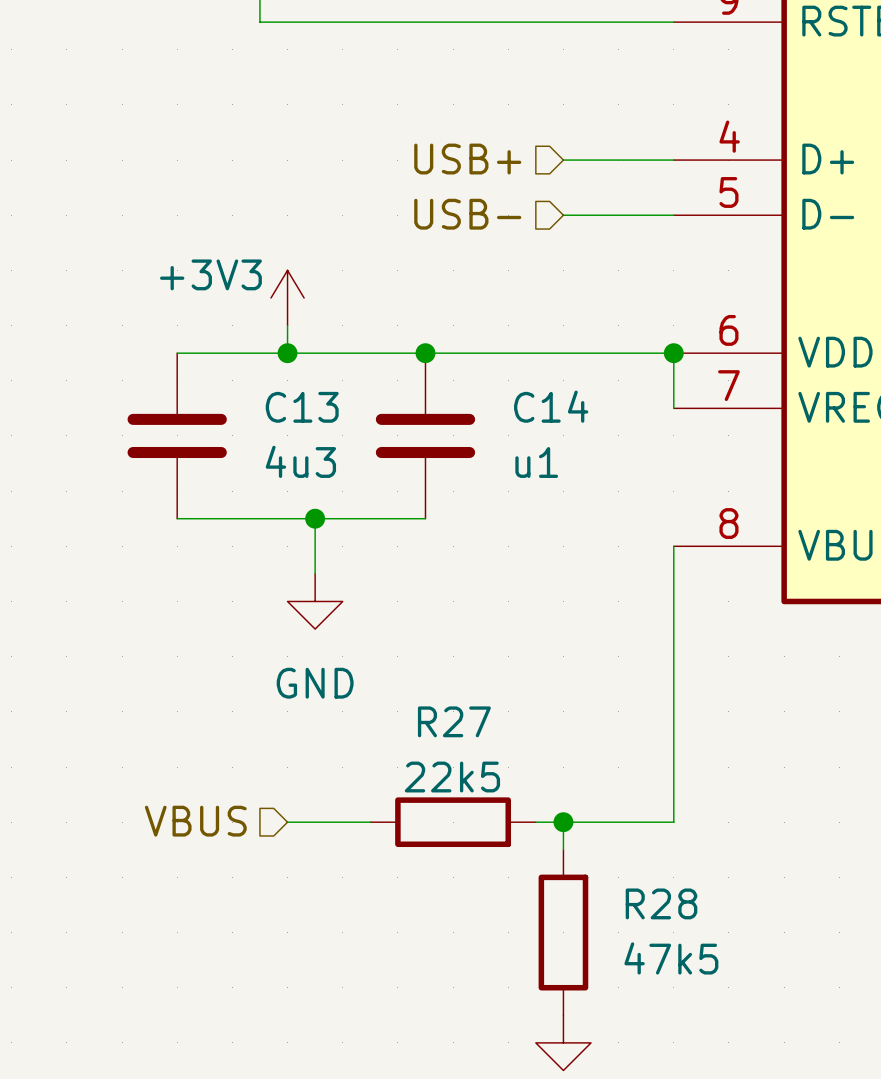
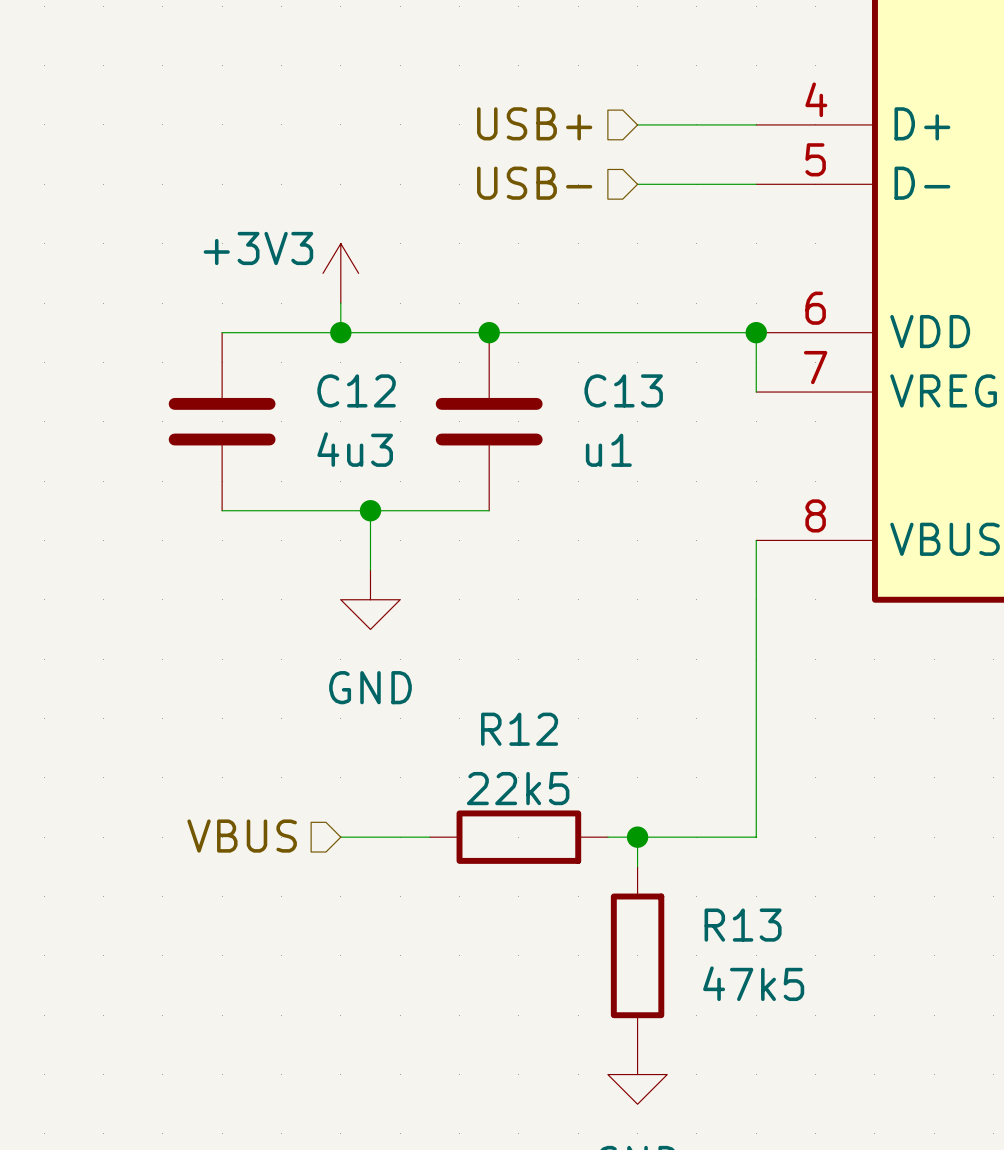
C14 name: C14 (551, 406) -> C13 (623, 390)
C13 name: C13 (302, 407) -> C12 (356, 390)
R27 name: R27 (454, 721) -> R12 (519, 729)
R28 name: R28 (661, 903) -> R13 (743, 925)

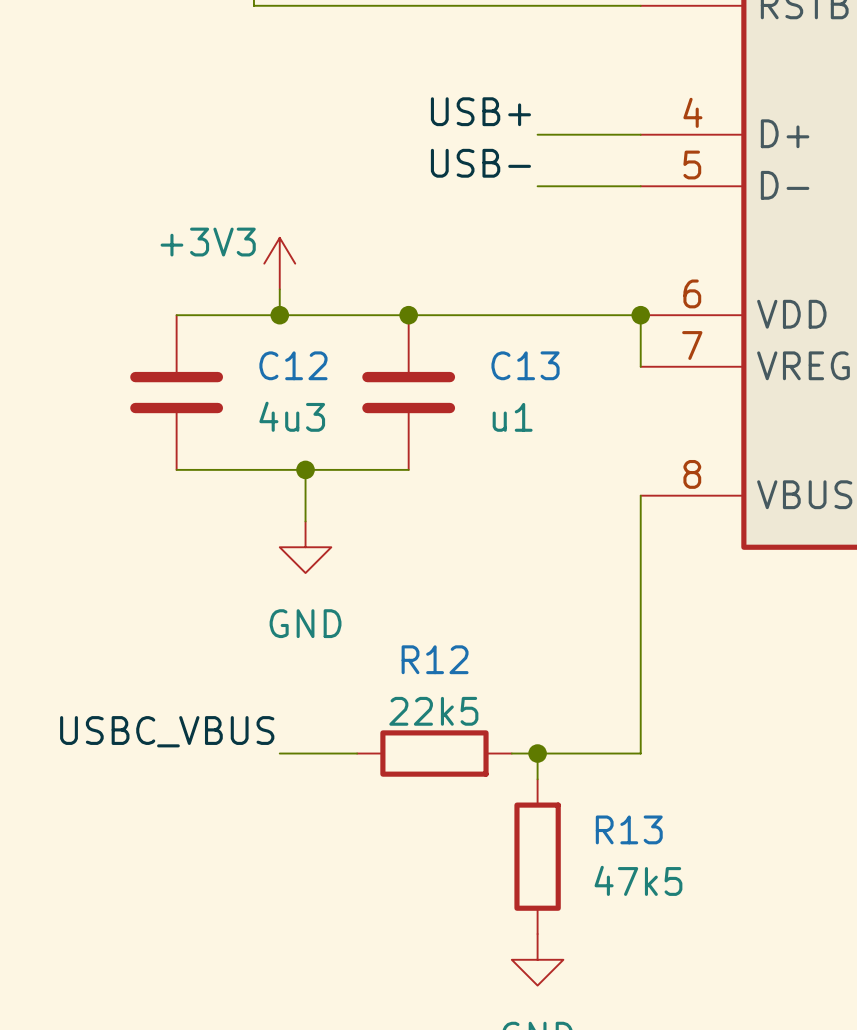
label: none -> USB+ (480, 111)
hierarchical label: USB+ (534, 123) -> none
label: none -> USB- (480, 163)
hierarchical label: USB- (534, 183) -> none
label: none -> USBC_VBUS (167, 731)
hierarchical label: VBUS (242, 836) -> none

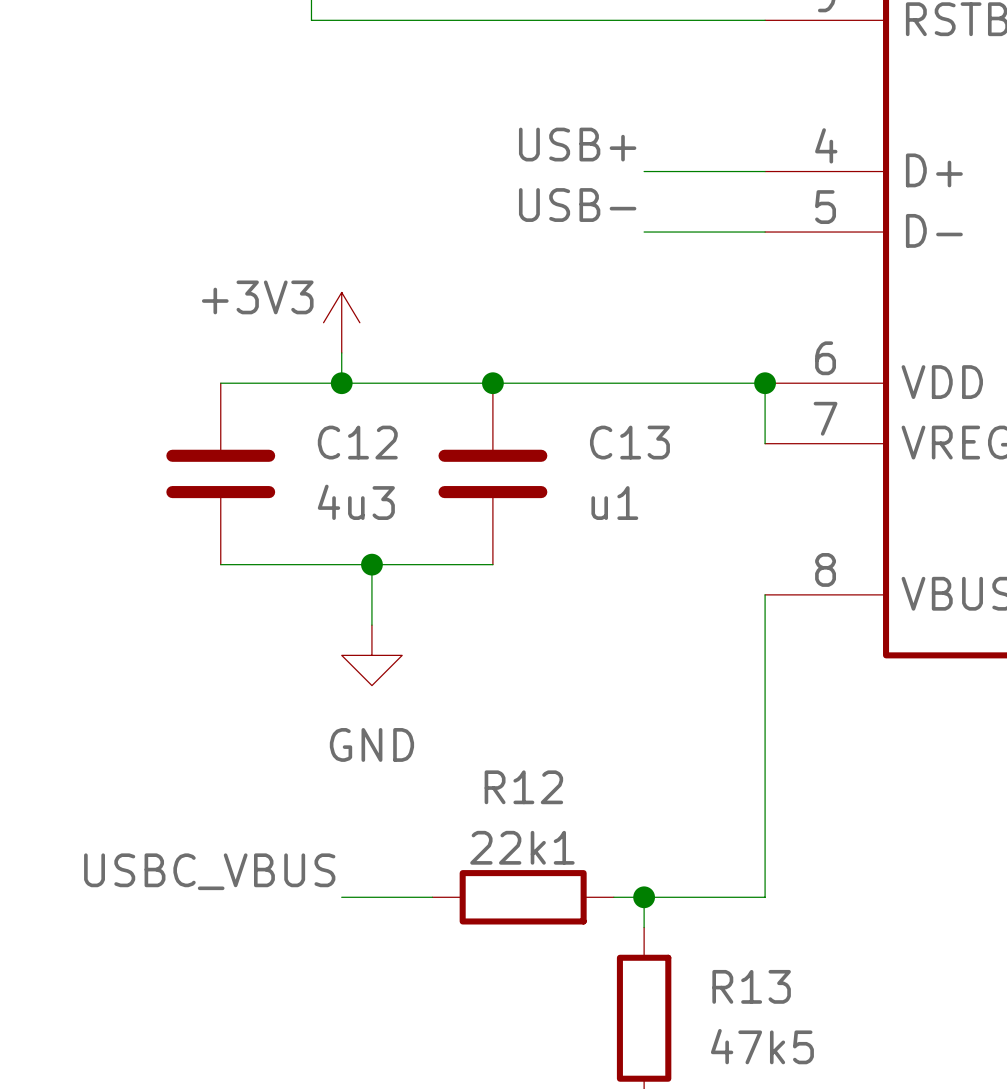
R12 value: 22k5 (433, 711) -> 22k1 (522, 847)

